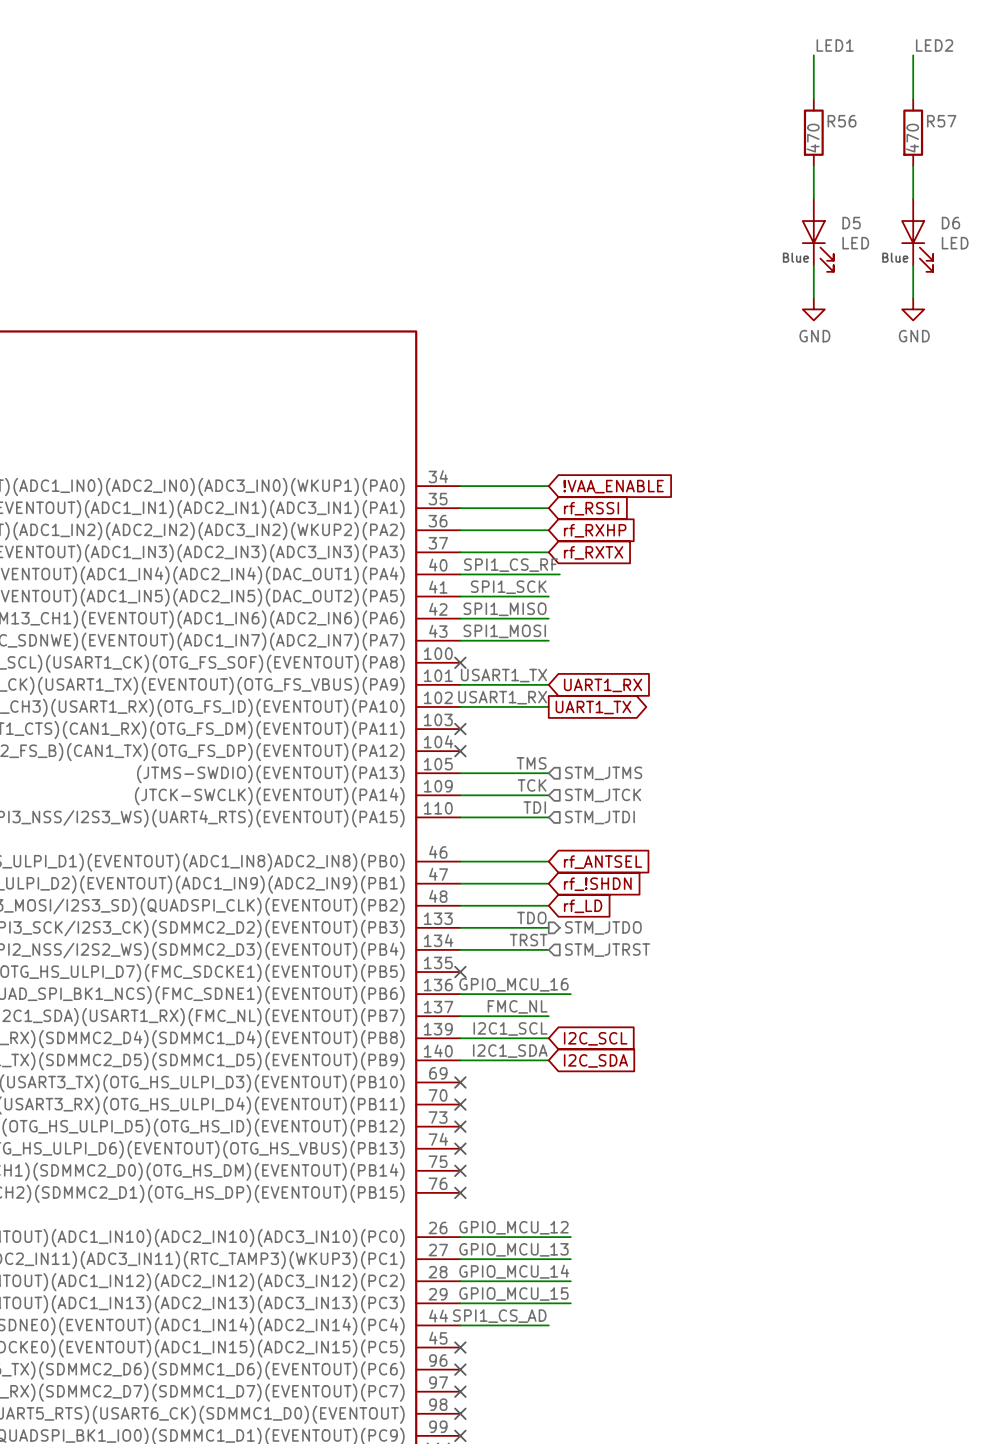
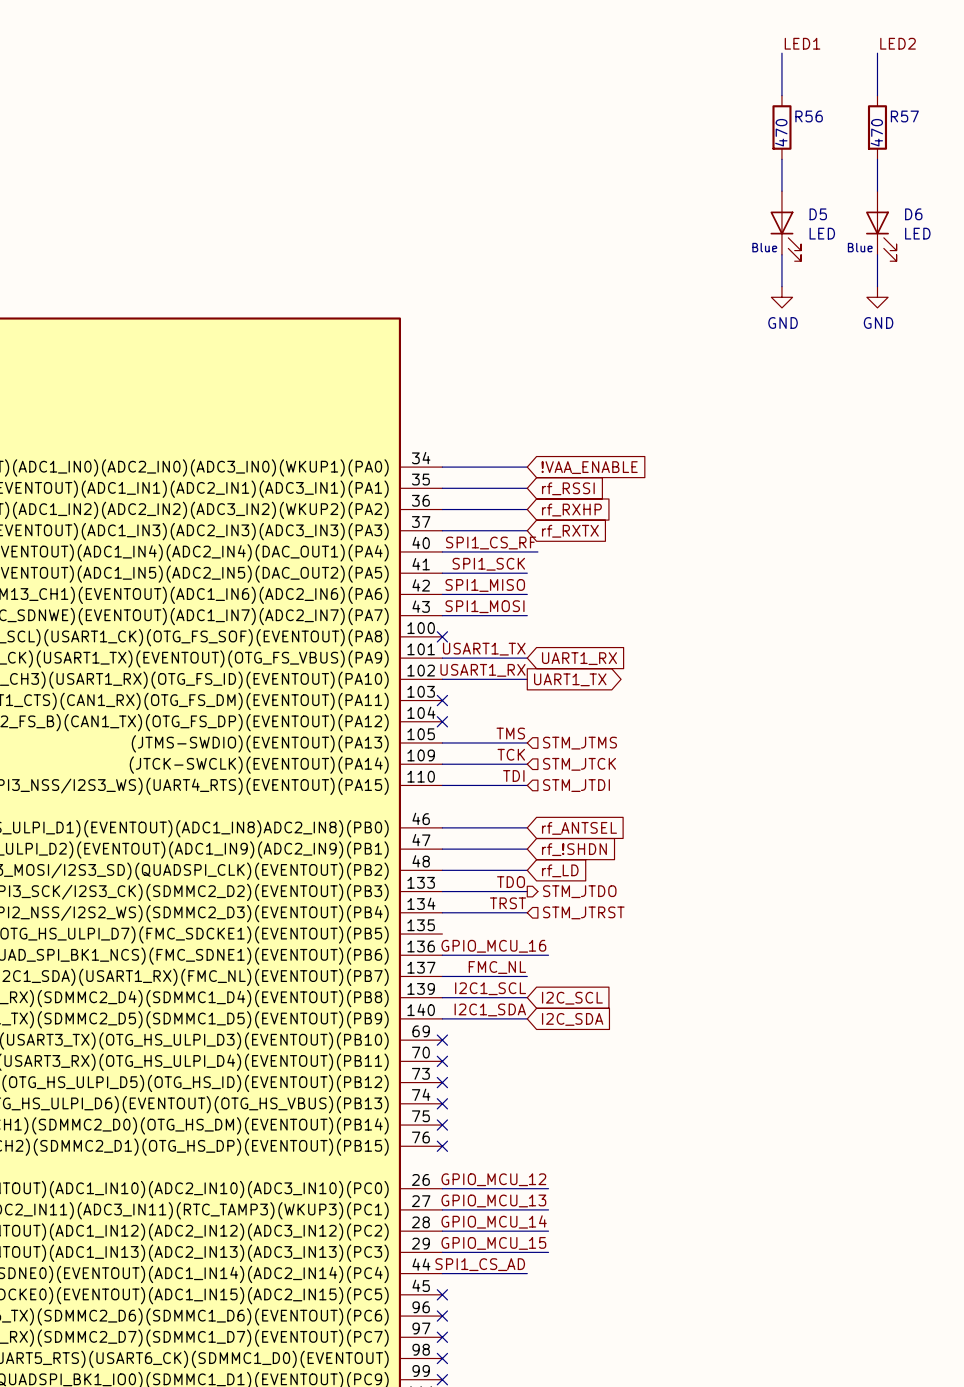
no-connect mark: (460, 972) -> none

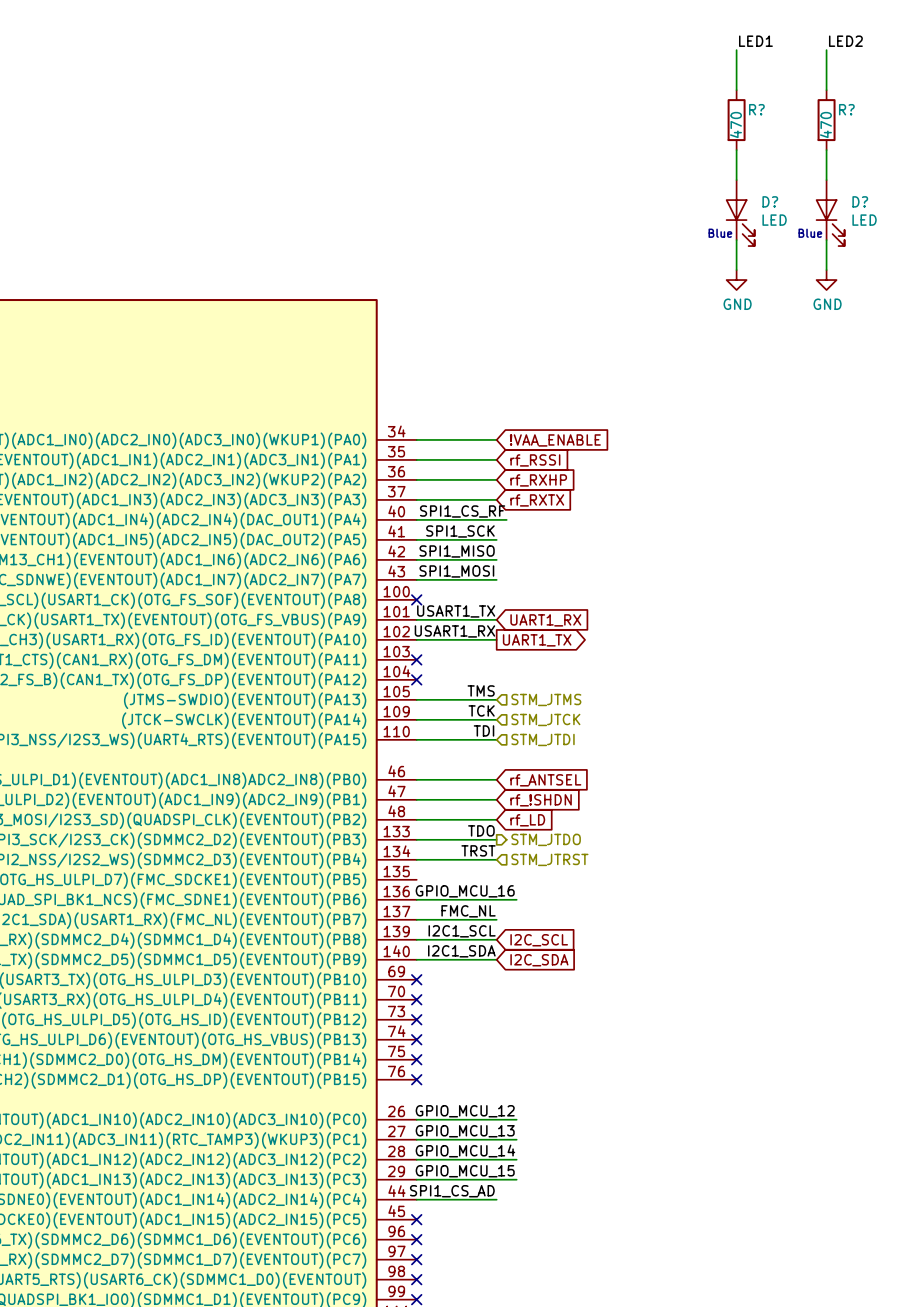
R56 name: R56 (809, 116) -> R? (756, 109)
R57 name: R57 (904, 116) -> R? (846, 109)
D5 name: D5 (818, 214) -> D? (770, 201)
D6 name: D6 (913, 214) -> D? (860, 201)

